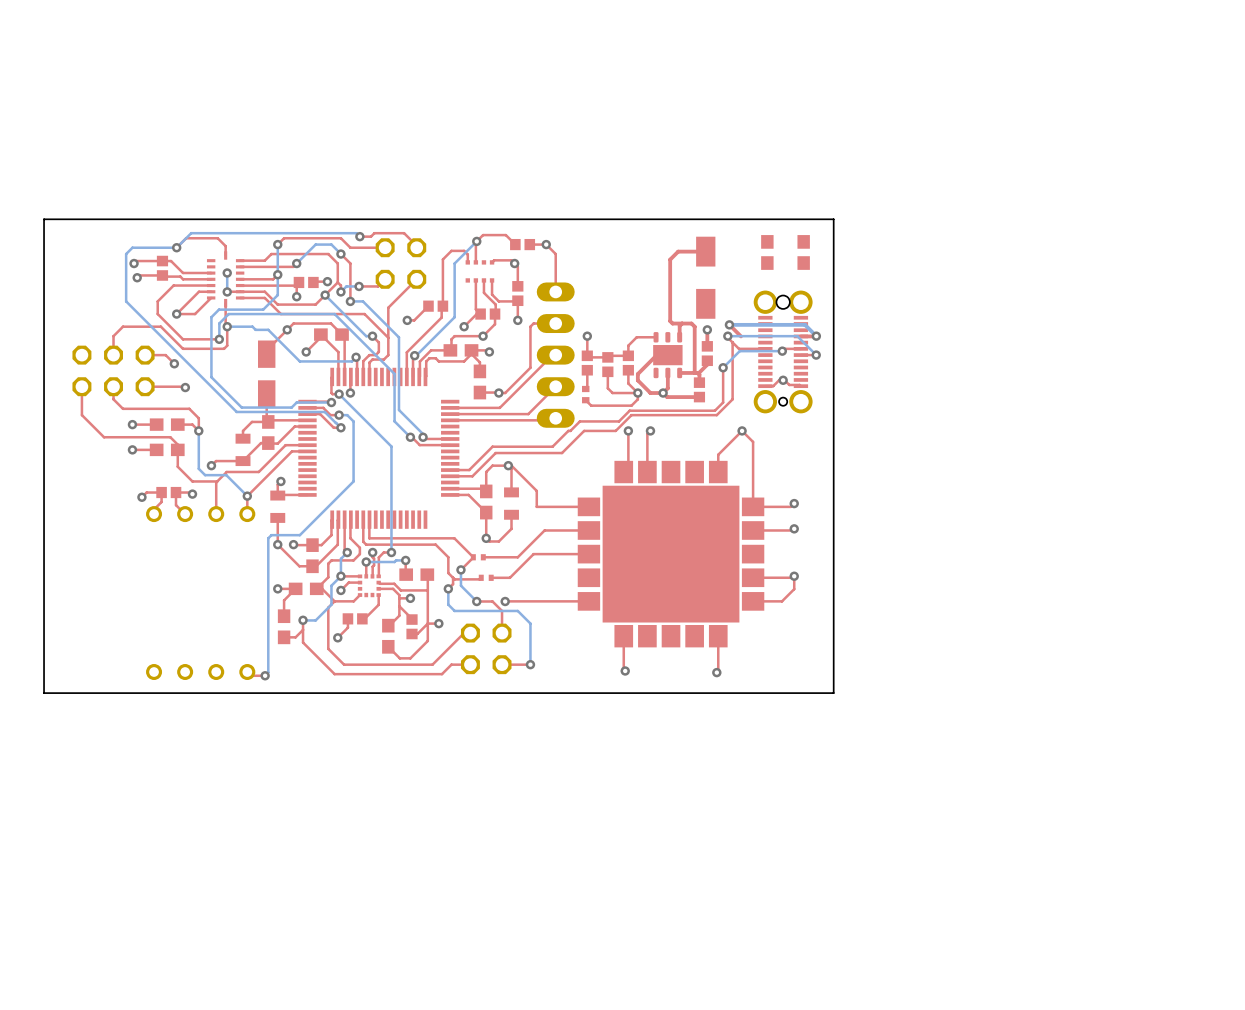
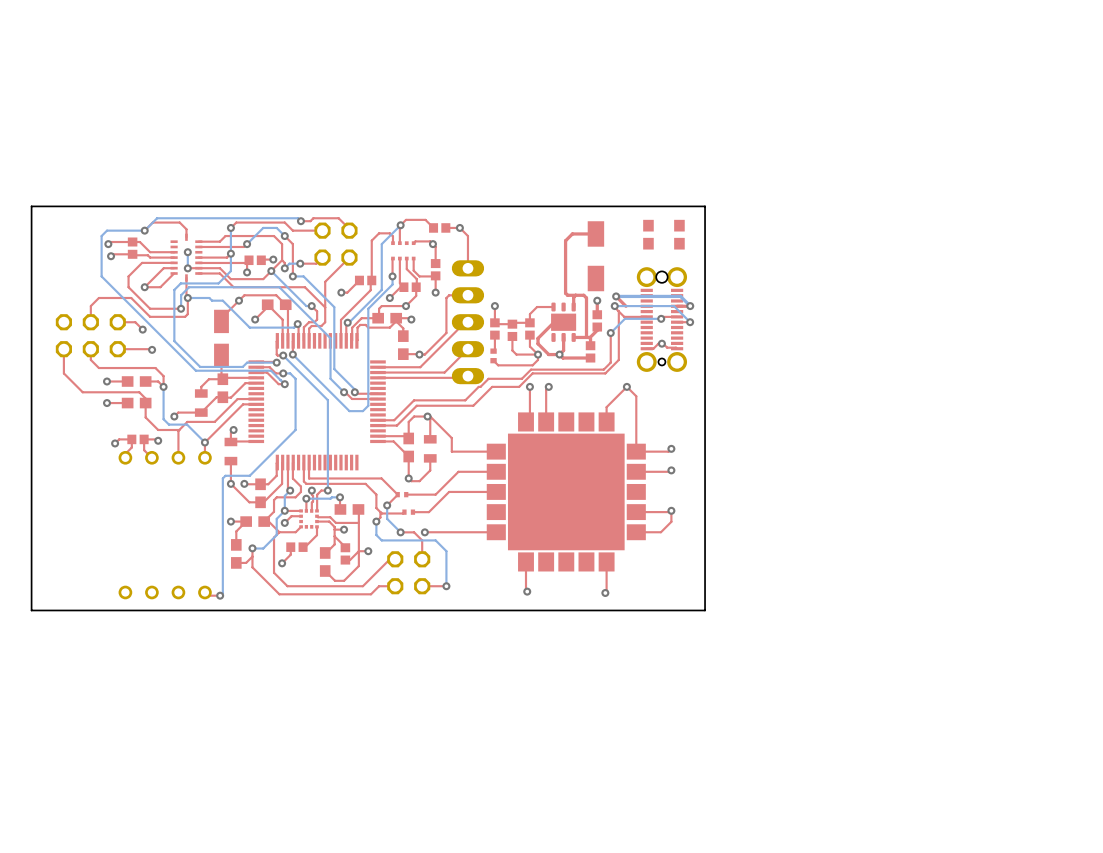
top track: none -> (392, 258) (392, 276)
bottom track: none -> (392, 276) (392, 284) (368, 308) (368, 405) (362, 411) (349, 411) (292, 354)
via: none -> (392, 276)

